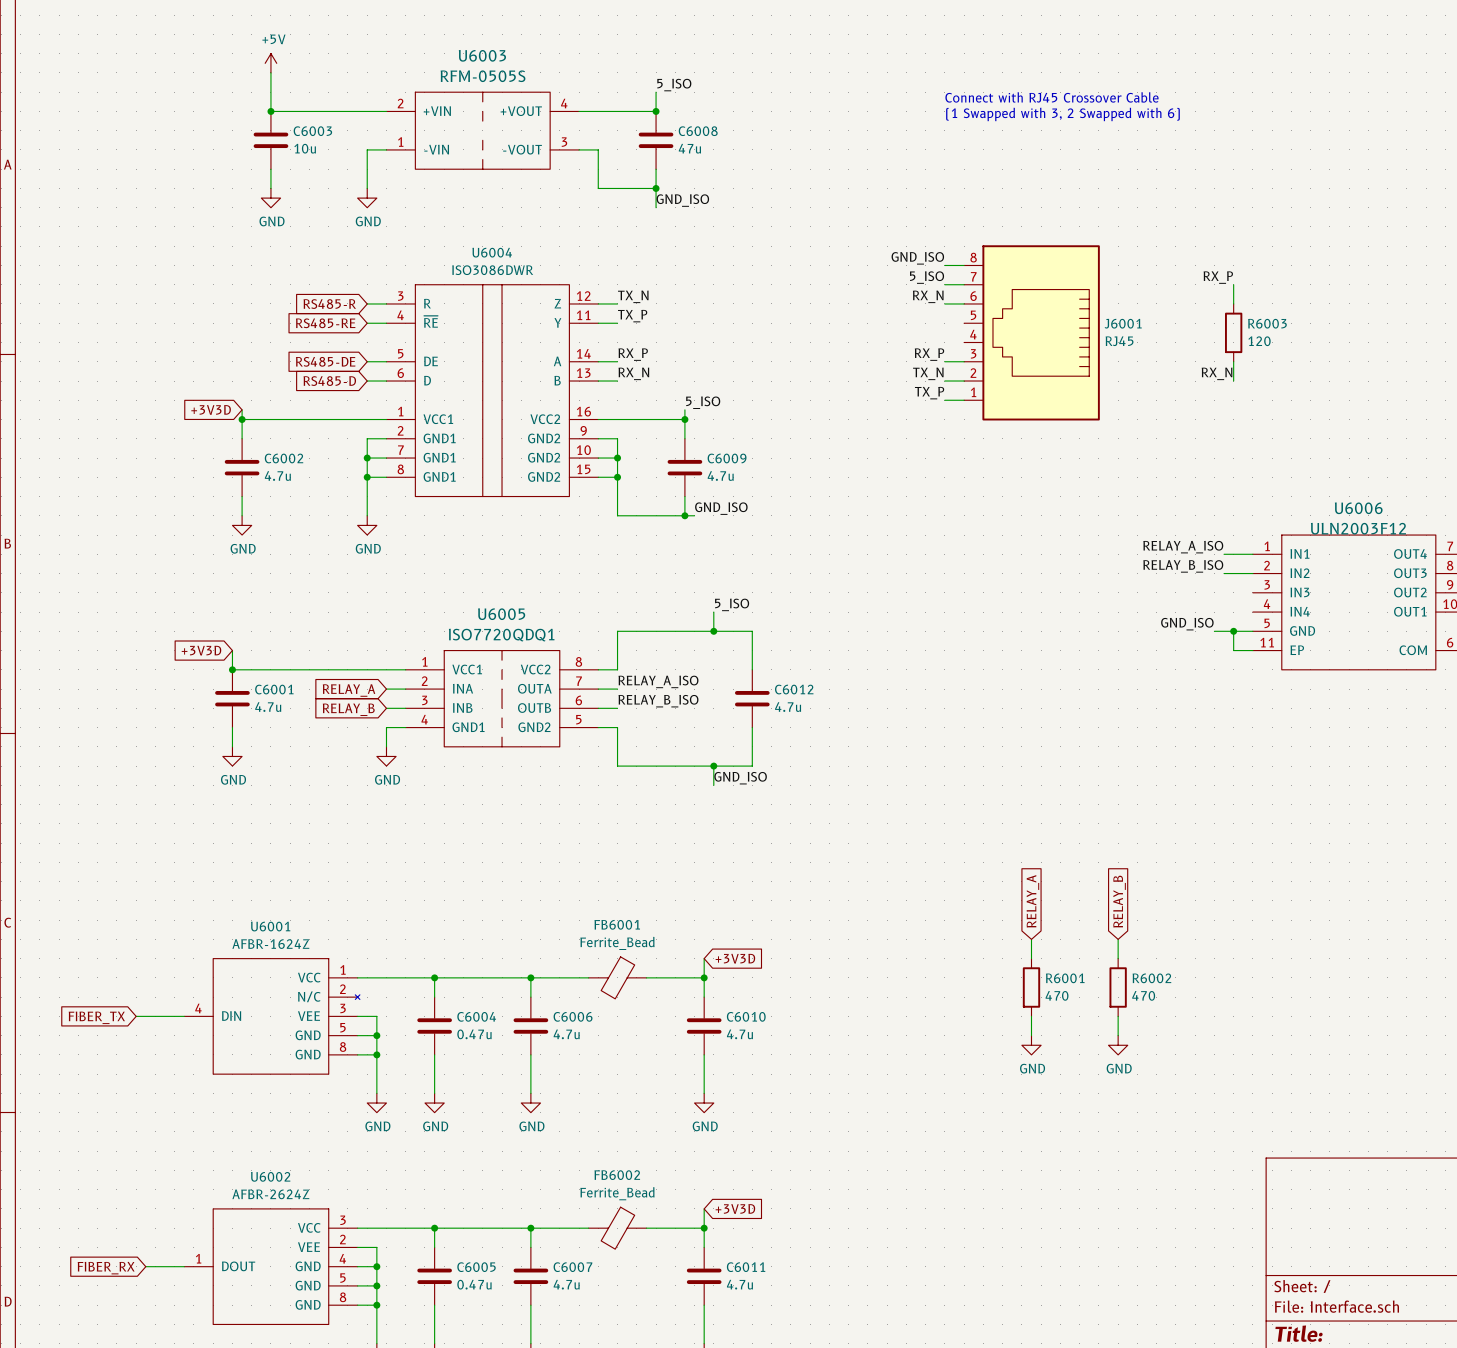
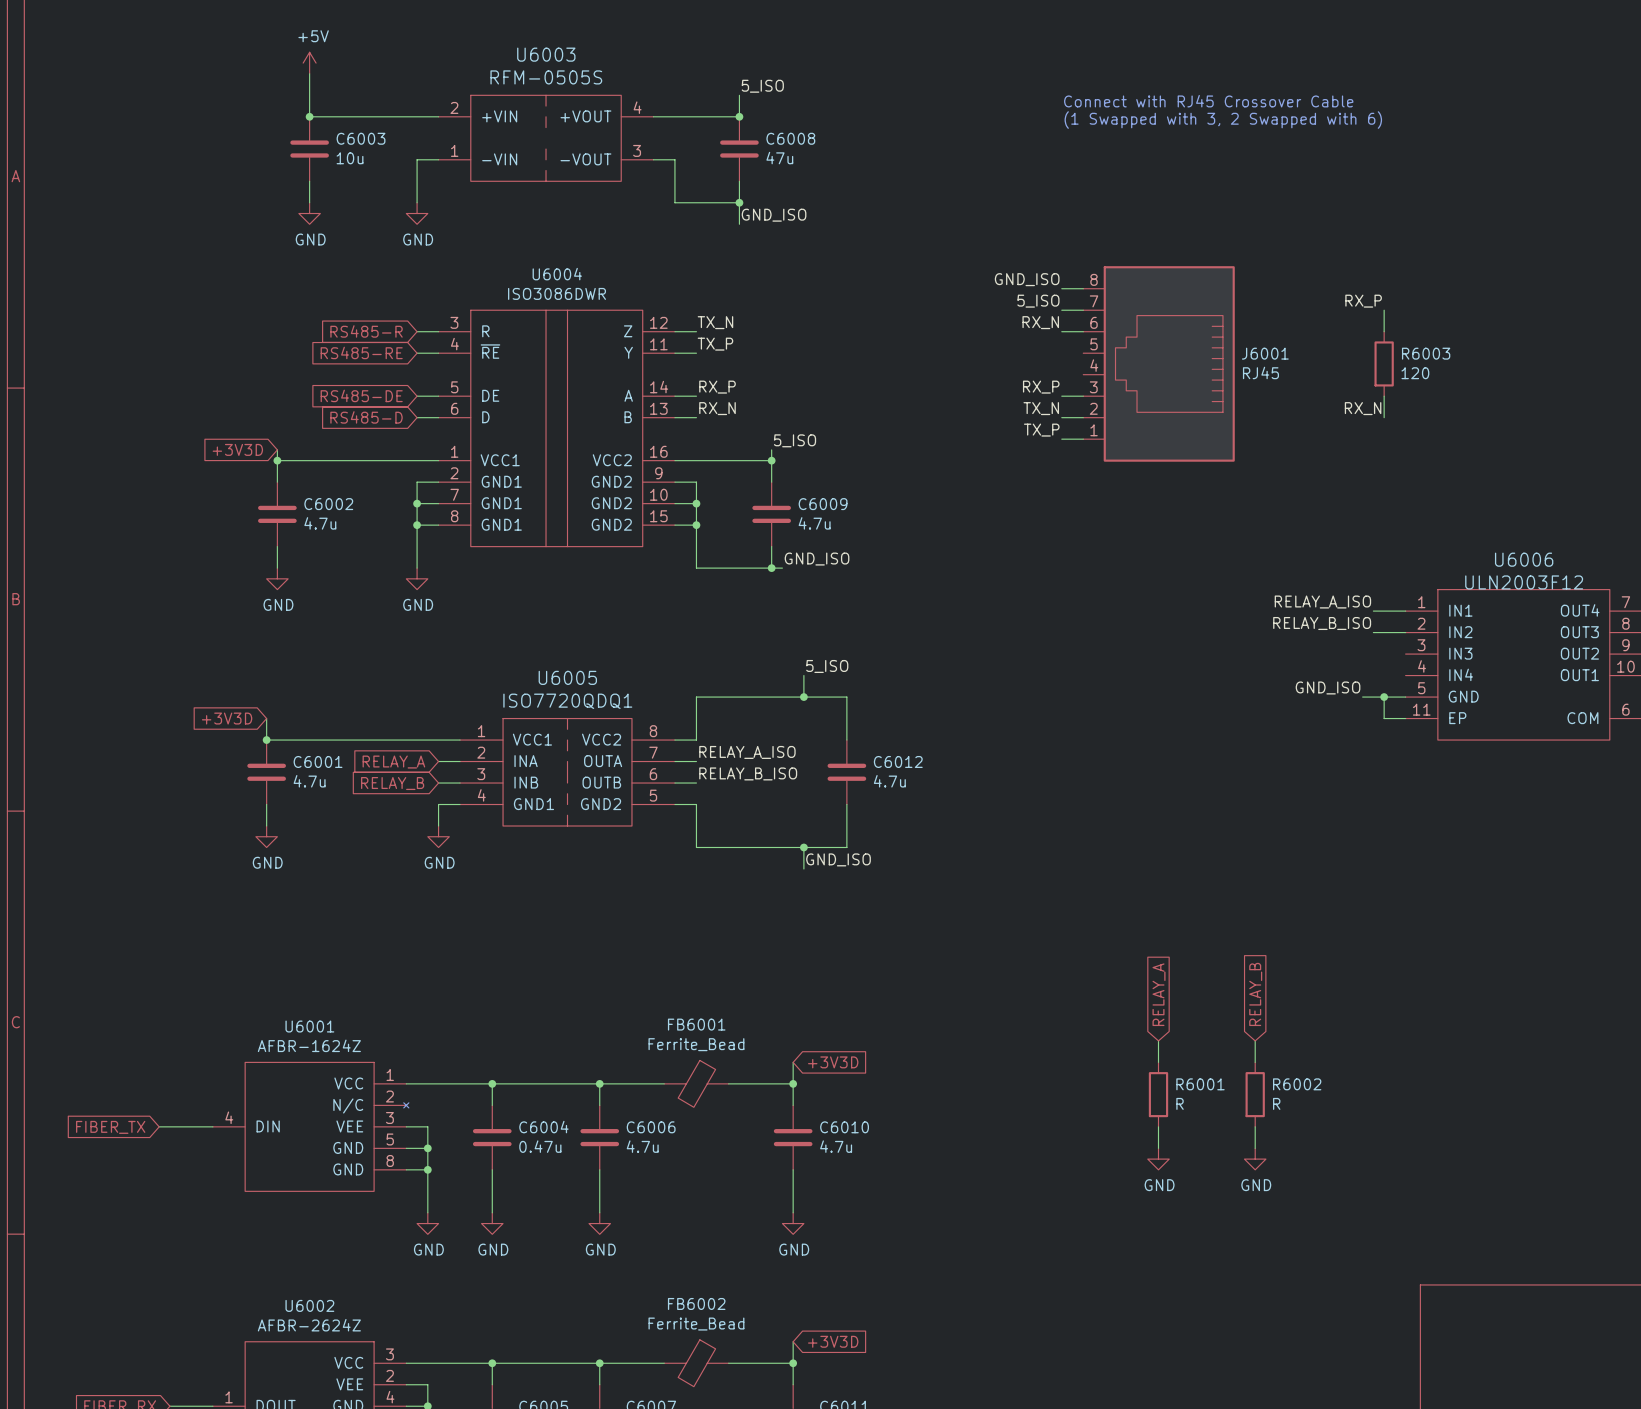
R6001 value: 470 (1057, 995) -> R (1180, 1103)
R6002 value: 470 (1143, 995) -> R (1276, 1103)

